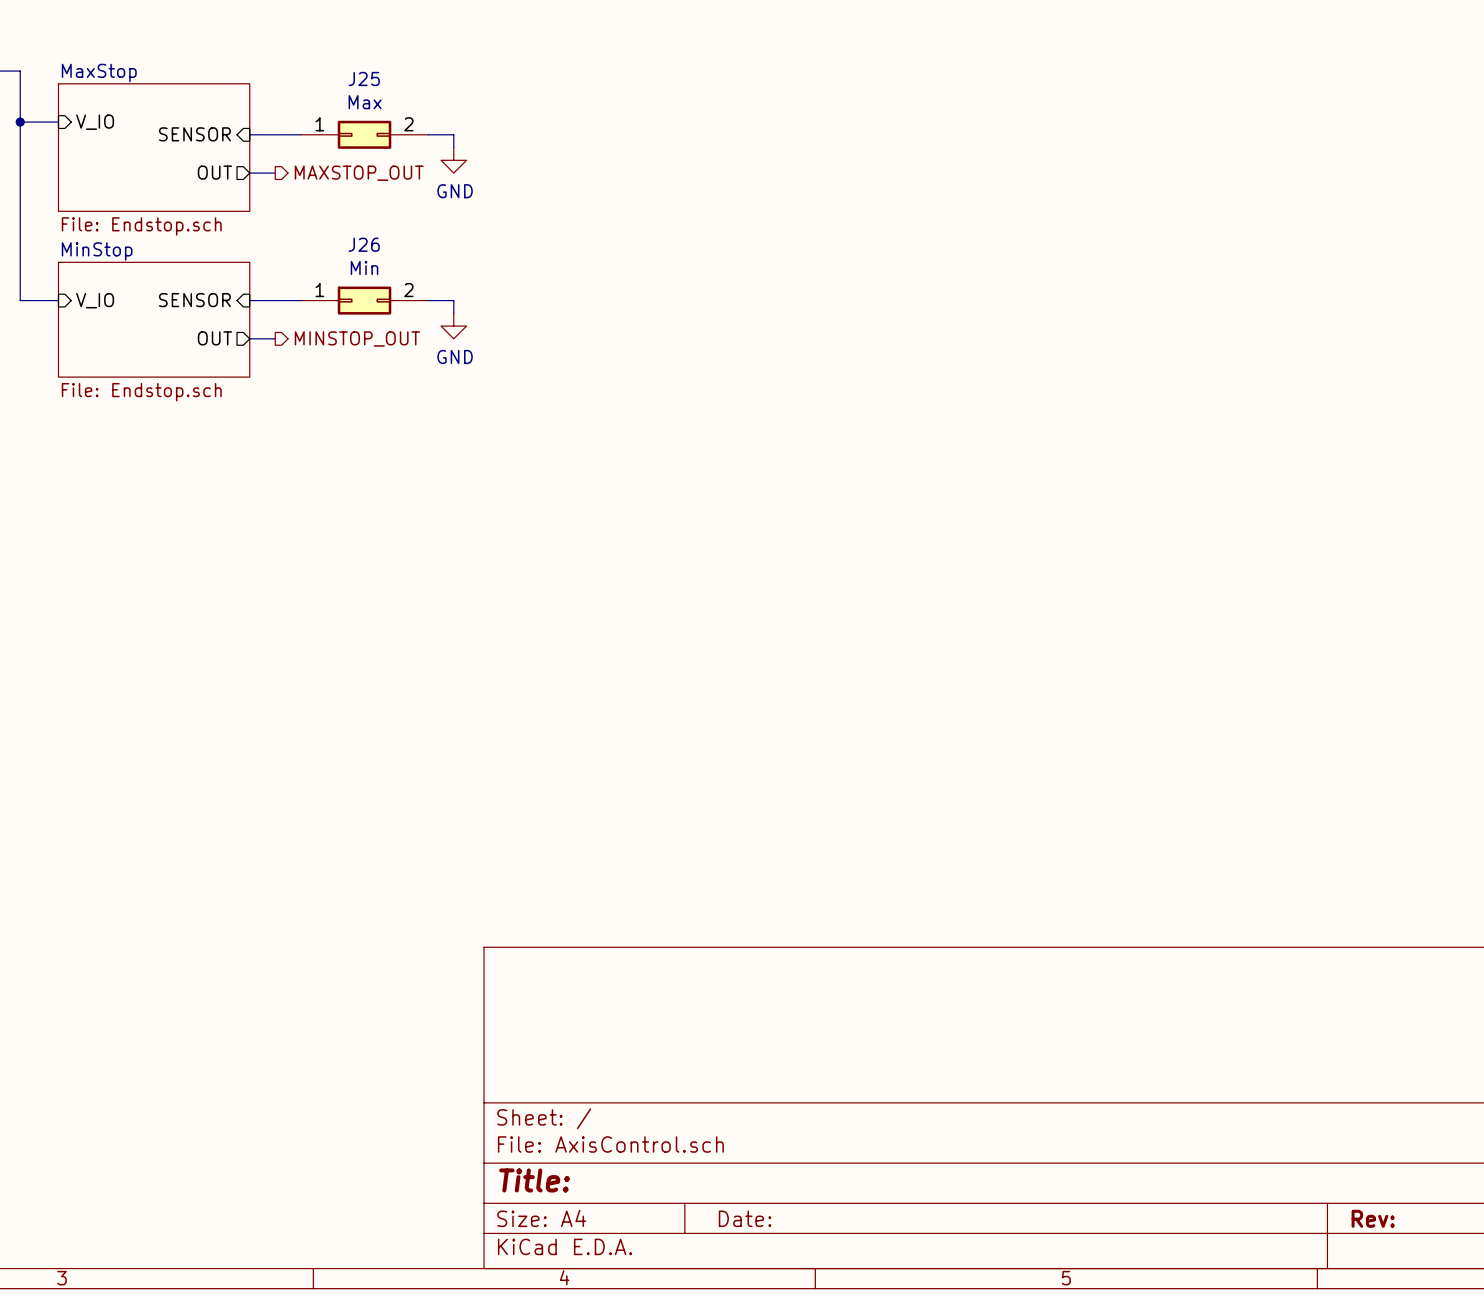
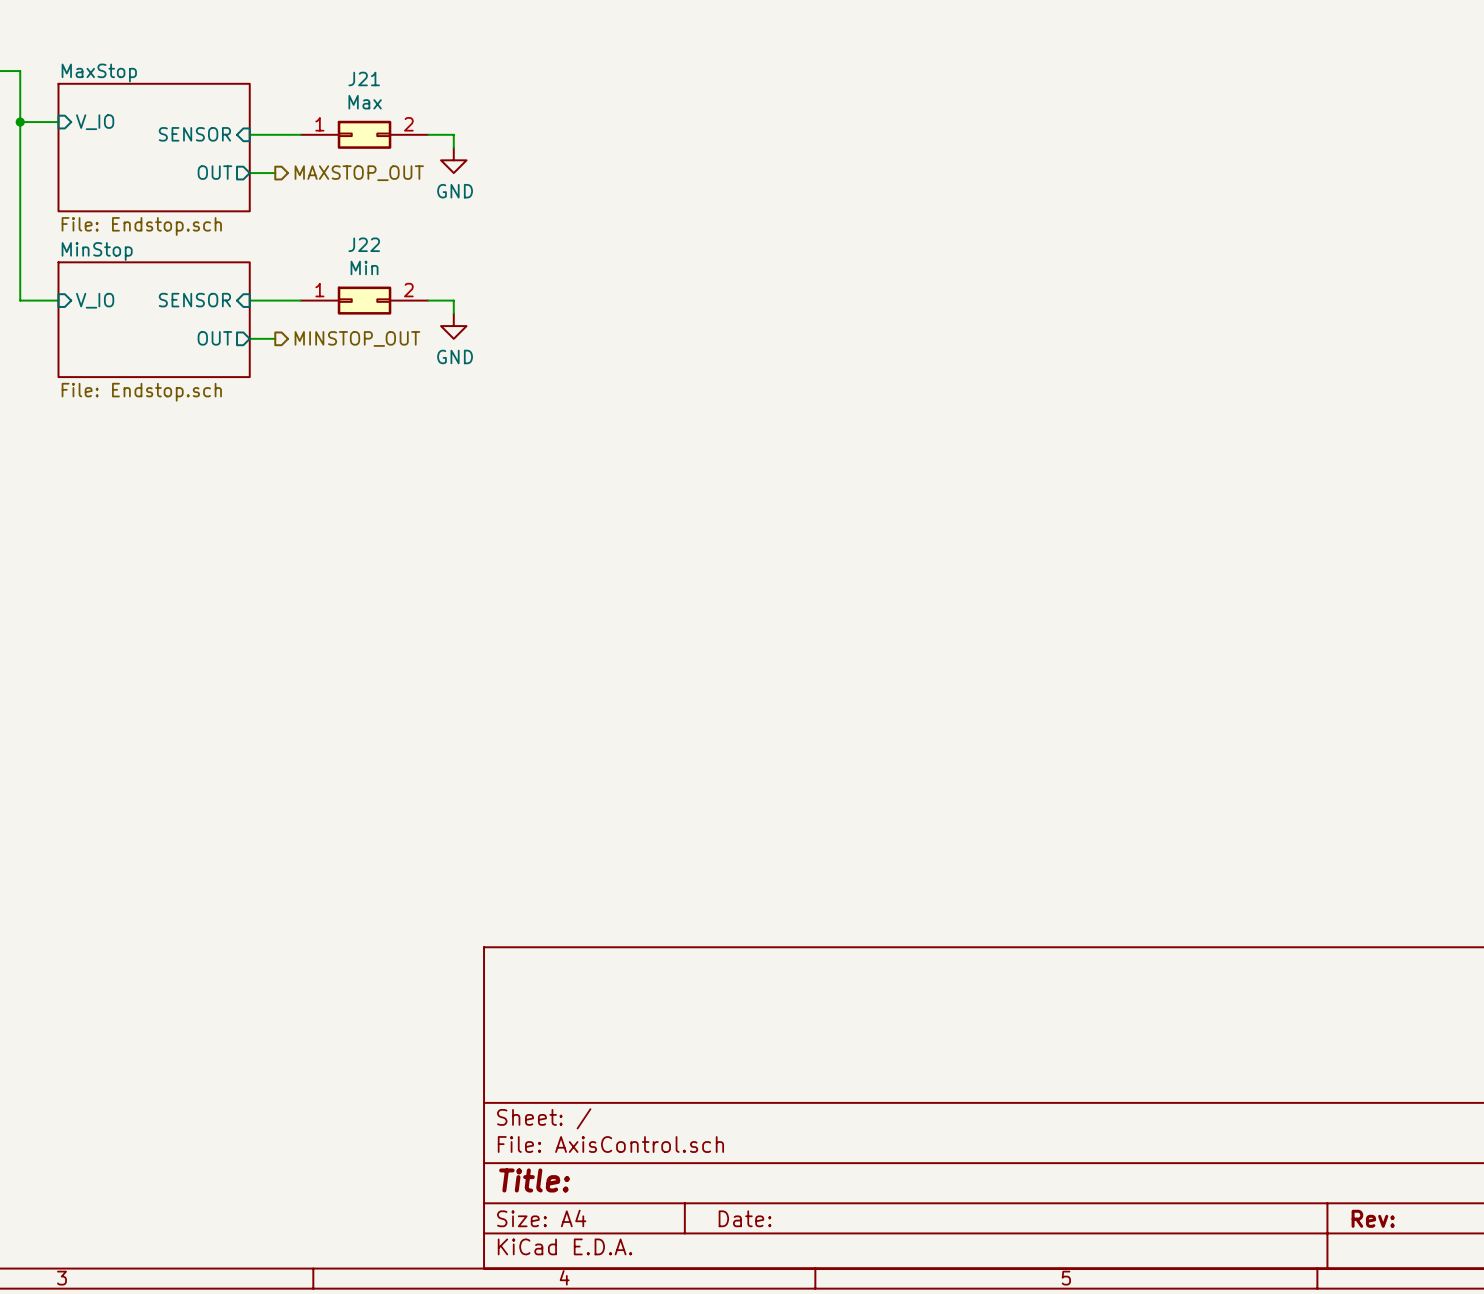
J25 name: J25 (364, 78) -> J21 (364, 78)
J26 name: J26 (364, 244) -> J22 (364, 244)

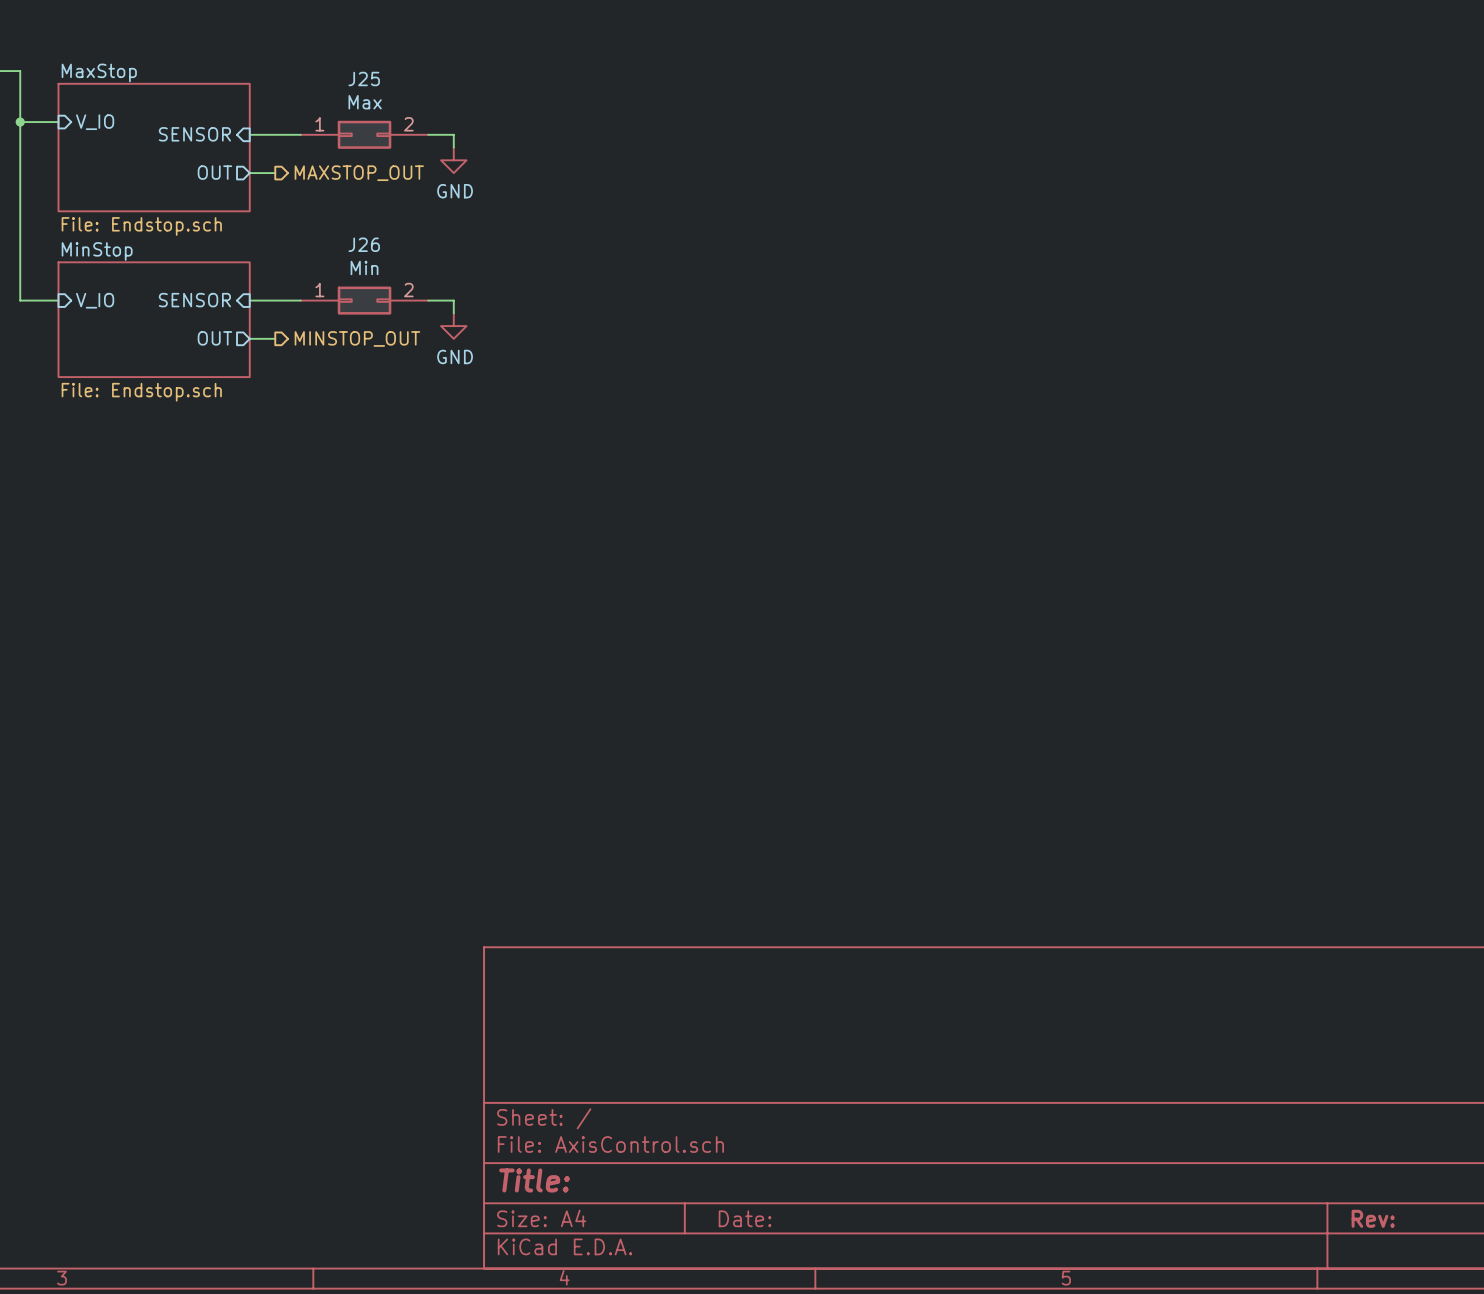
J21 name: J21 (364, 78) -> J25 (364, 78)
J22 name: J22 (364, 244) -> J26 (364, 244)

